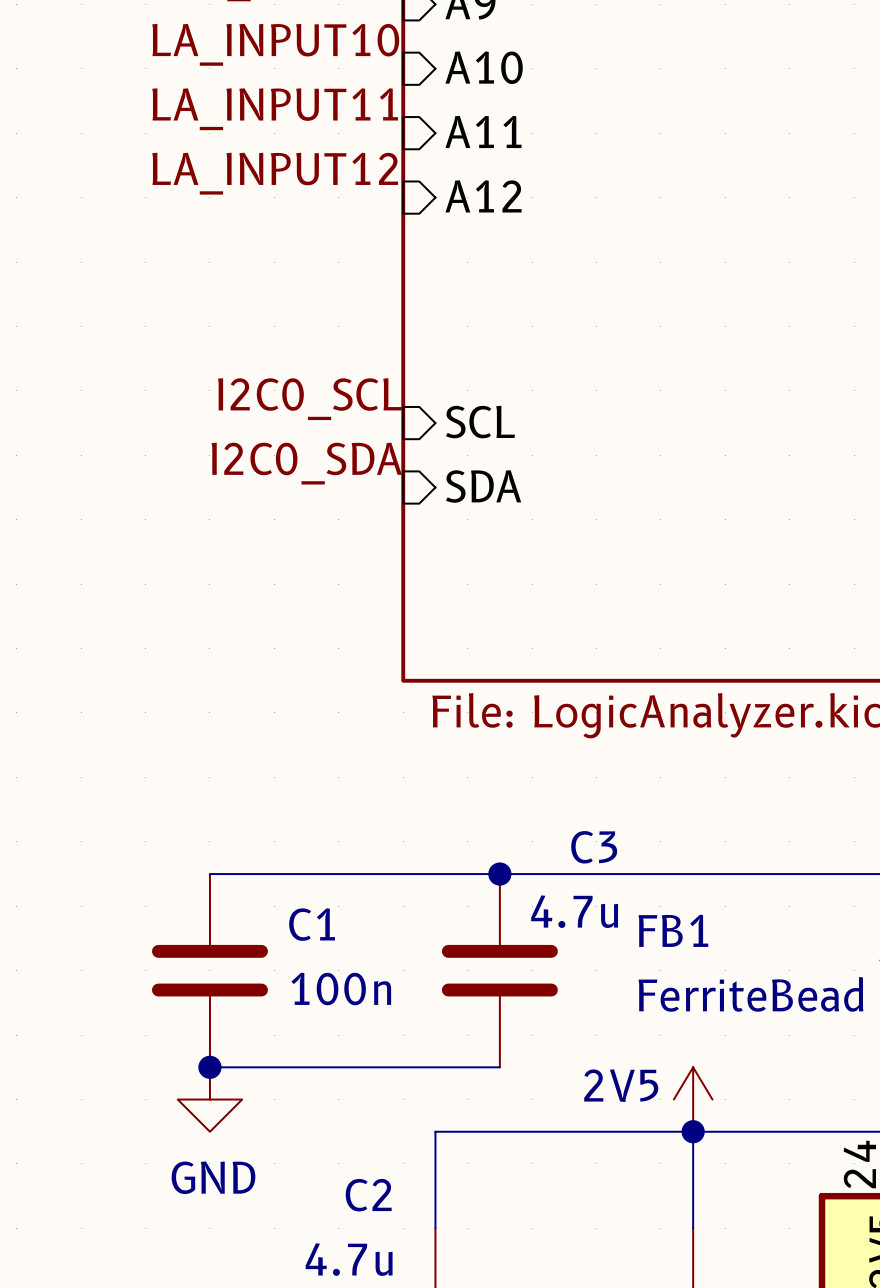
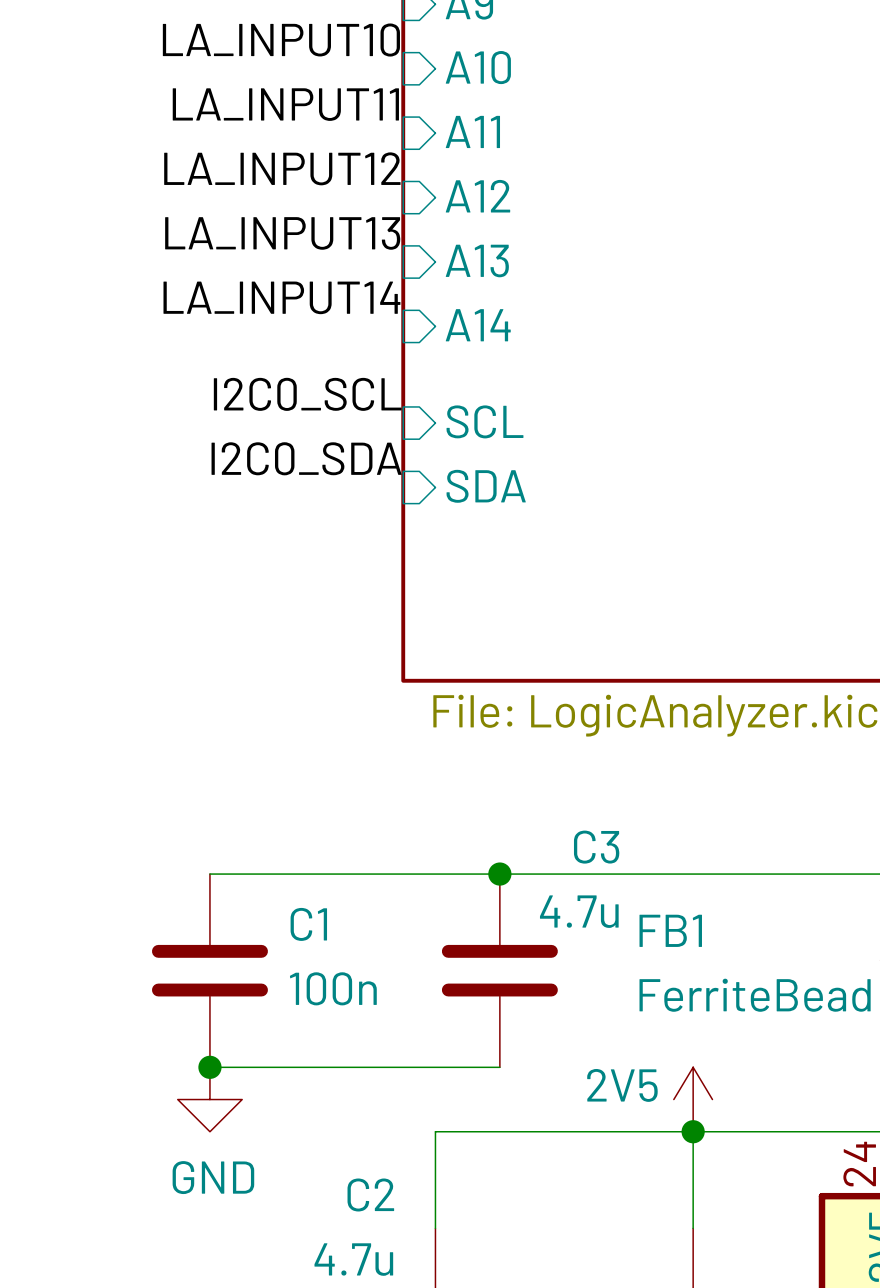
label: none -> LA_INPUT13 (282, 233)
sheet pin: none -> A13 (477, 261)
label: none -> LA_INPUT14 (281, 297)
sheet pin: none -> A14 (478, 325)

